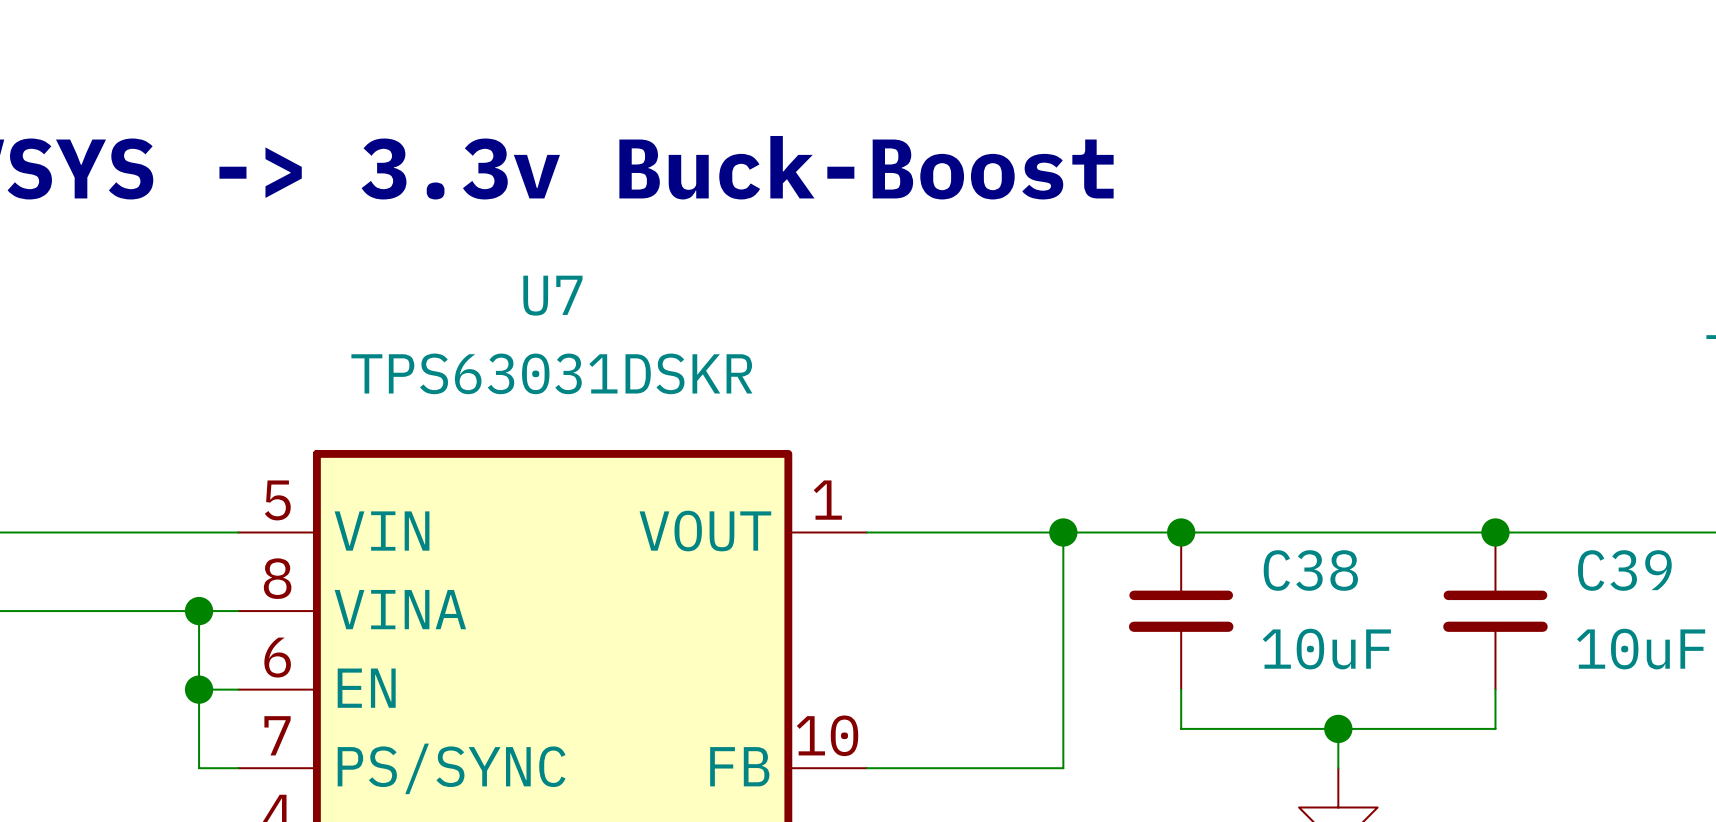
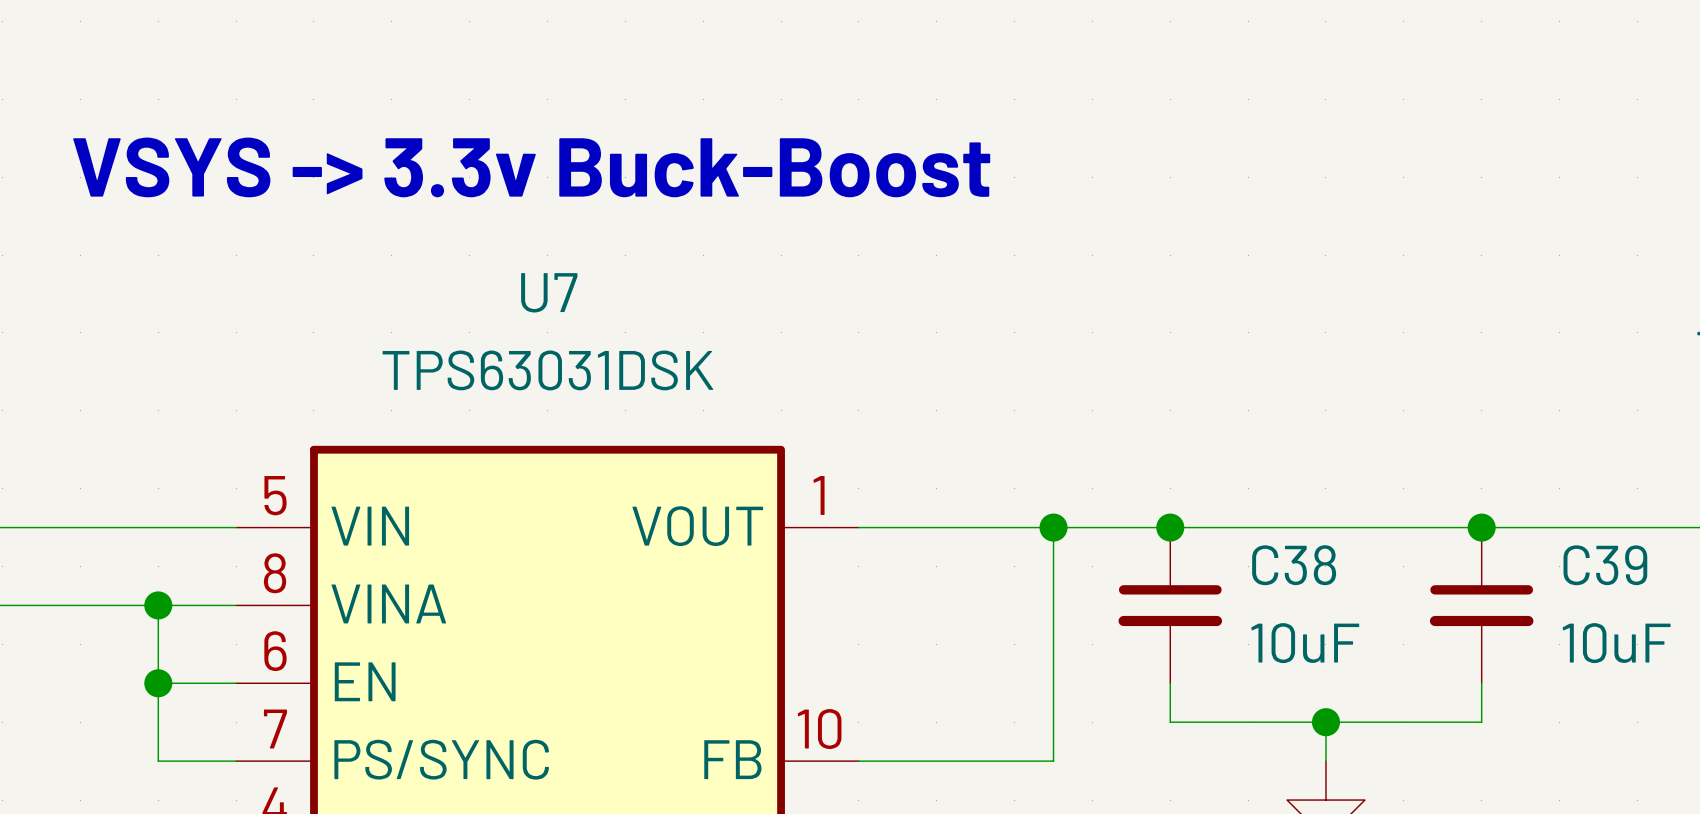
U7 value: TPS63031DSKR (551, 373) -> TPS63031DSK (547, 370)
wire: (199, 611) (199, 768) -> (158, 605) (158, 761) (197, 761)
junction position: (199, 611) -> (158, 605)
wire: none -> (158, 683) (197, 683)
junction position: (199, 689) -> (158, 683)

